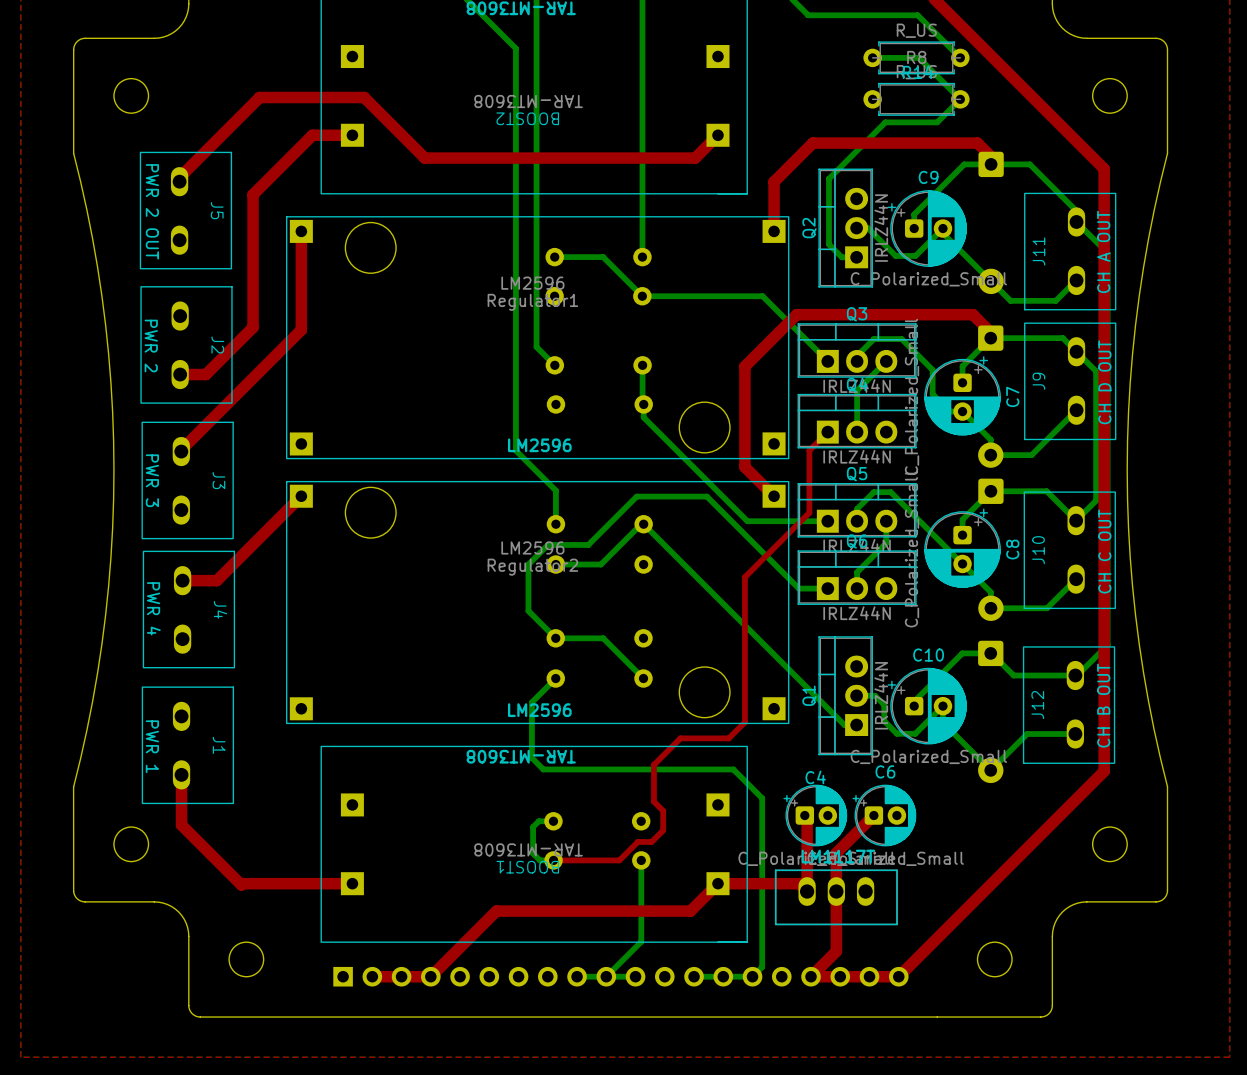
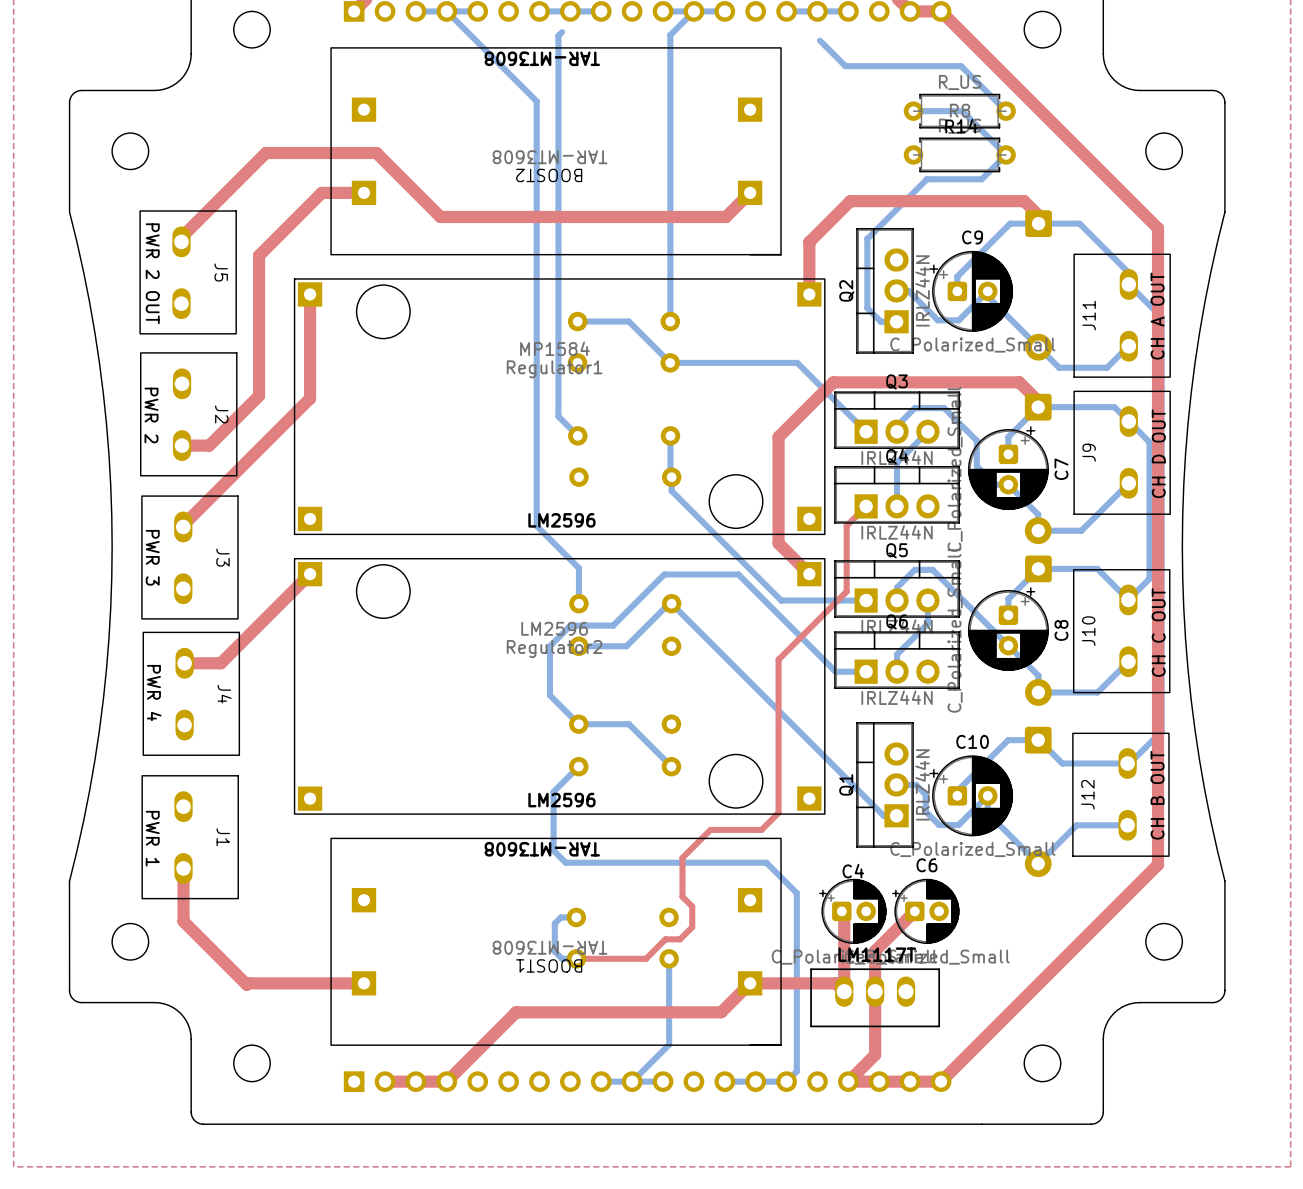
Regulator1 value: LM2596 (532, 283) -> MP1584 (554, 348)

